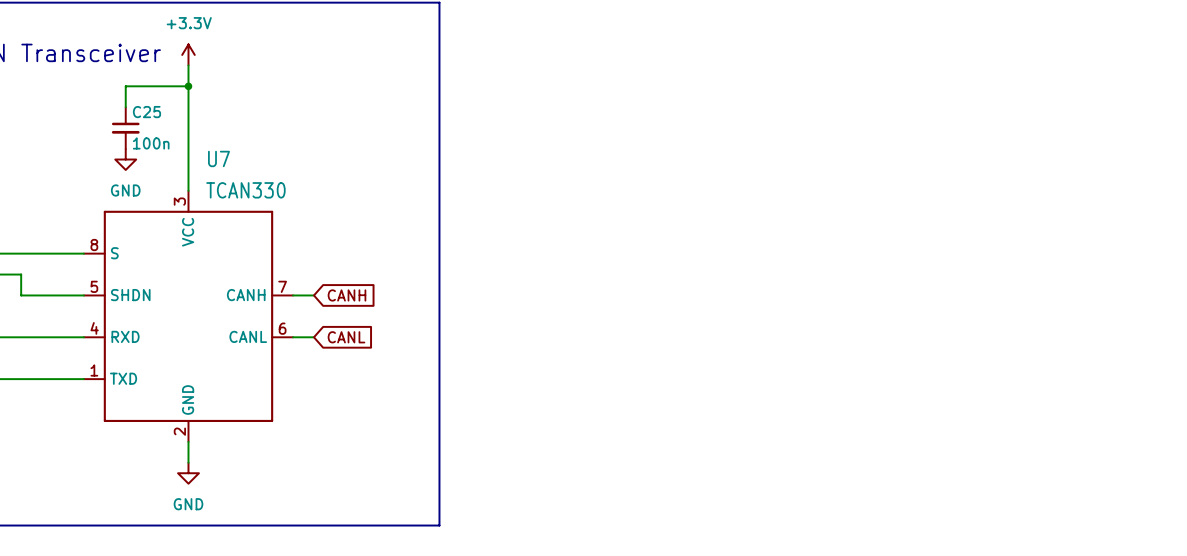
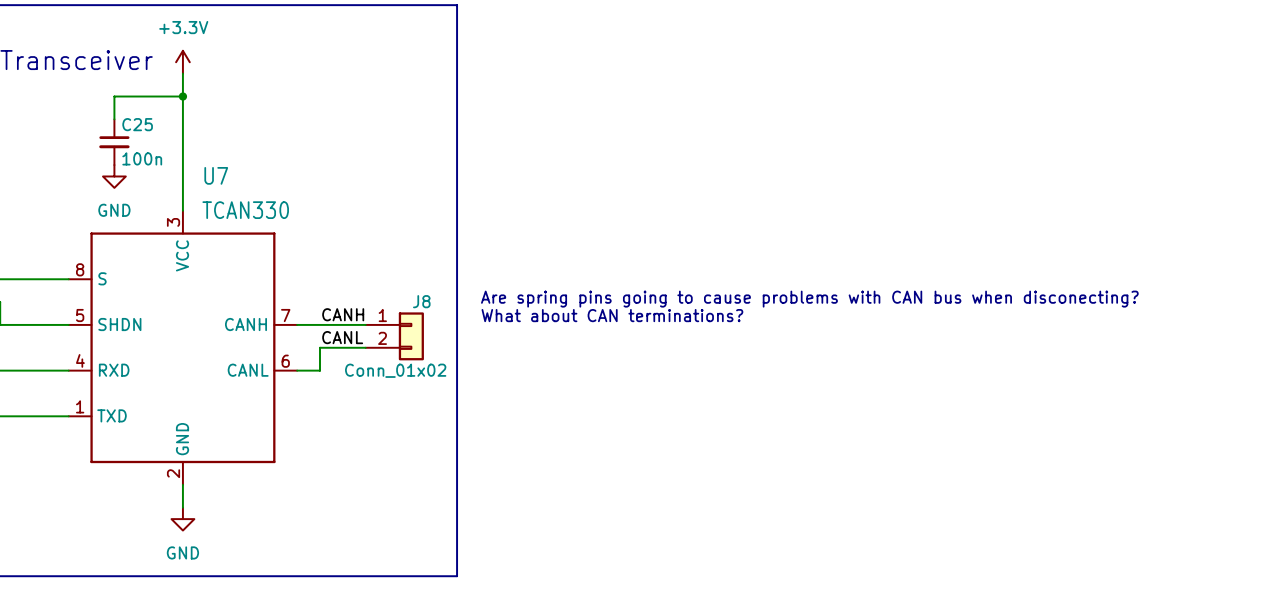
text: none -> Are spring pins going to cause problems with CAN bus when disconecting? (809, 299)
label: none -> CANH (343, 314)
text: none -> What about CAN terminations? (612, 315)
wire: none -> (320, 324) (365, 324)
global label: CANH (346, 295) -> none
J8: none -> Conn_01x02 (394, 336)
label: none -> CANL (342, 337)
wire: none -> (365, 347) (320, 347) (320, 370)
global label: CANL (346, 337) -> none

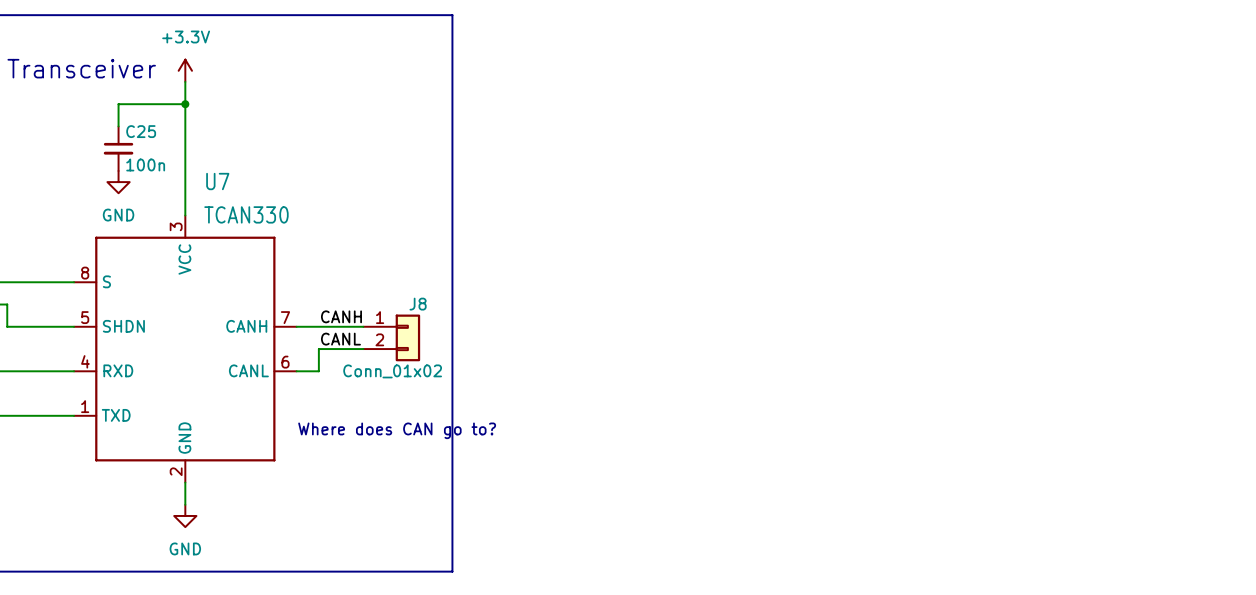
text: Are spring pins going to cause problems with CAN bus when disconecting? (809, 299) -> none
text: What about CAN terminations? (612, 315) -> none
text: none -> Where does CAN go to? (397, 430)

